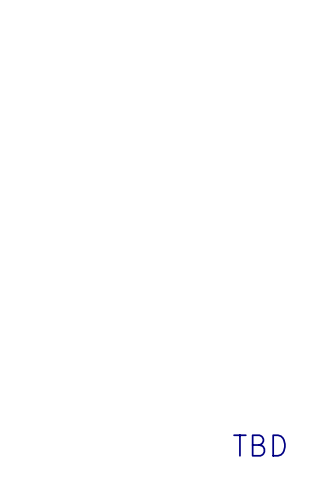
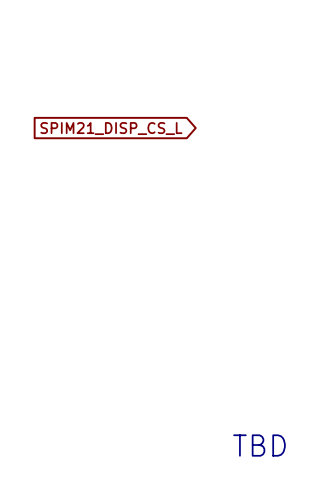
global label: none -> SPIM21_DISP_CS_L (111, 128)

